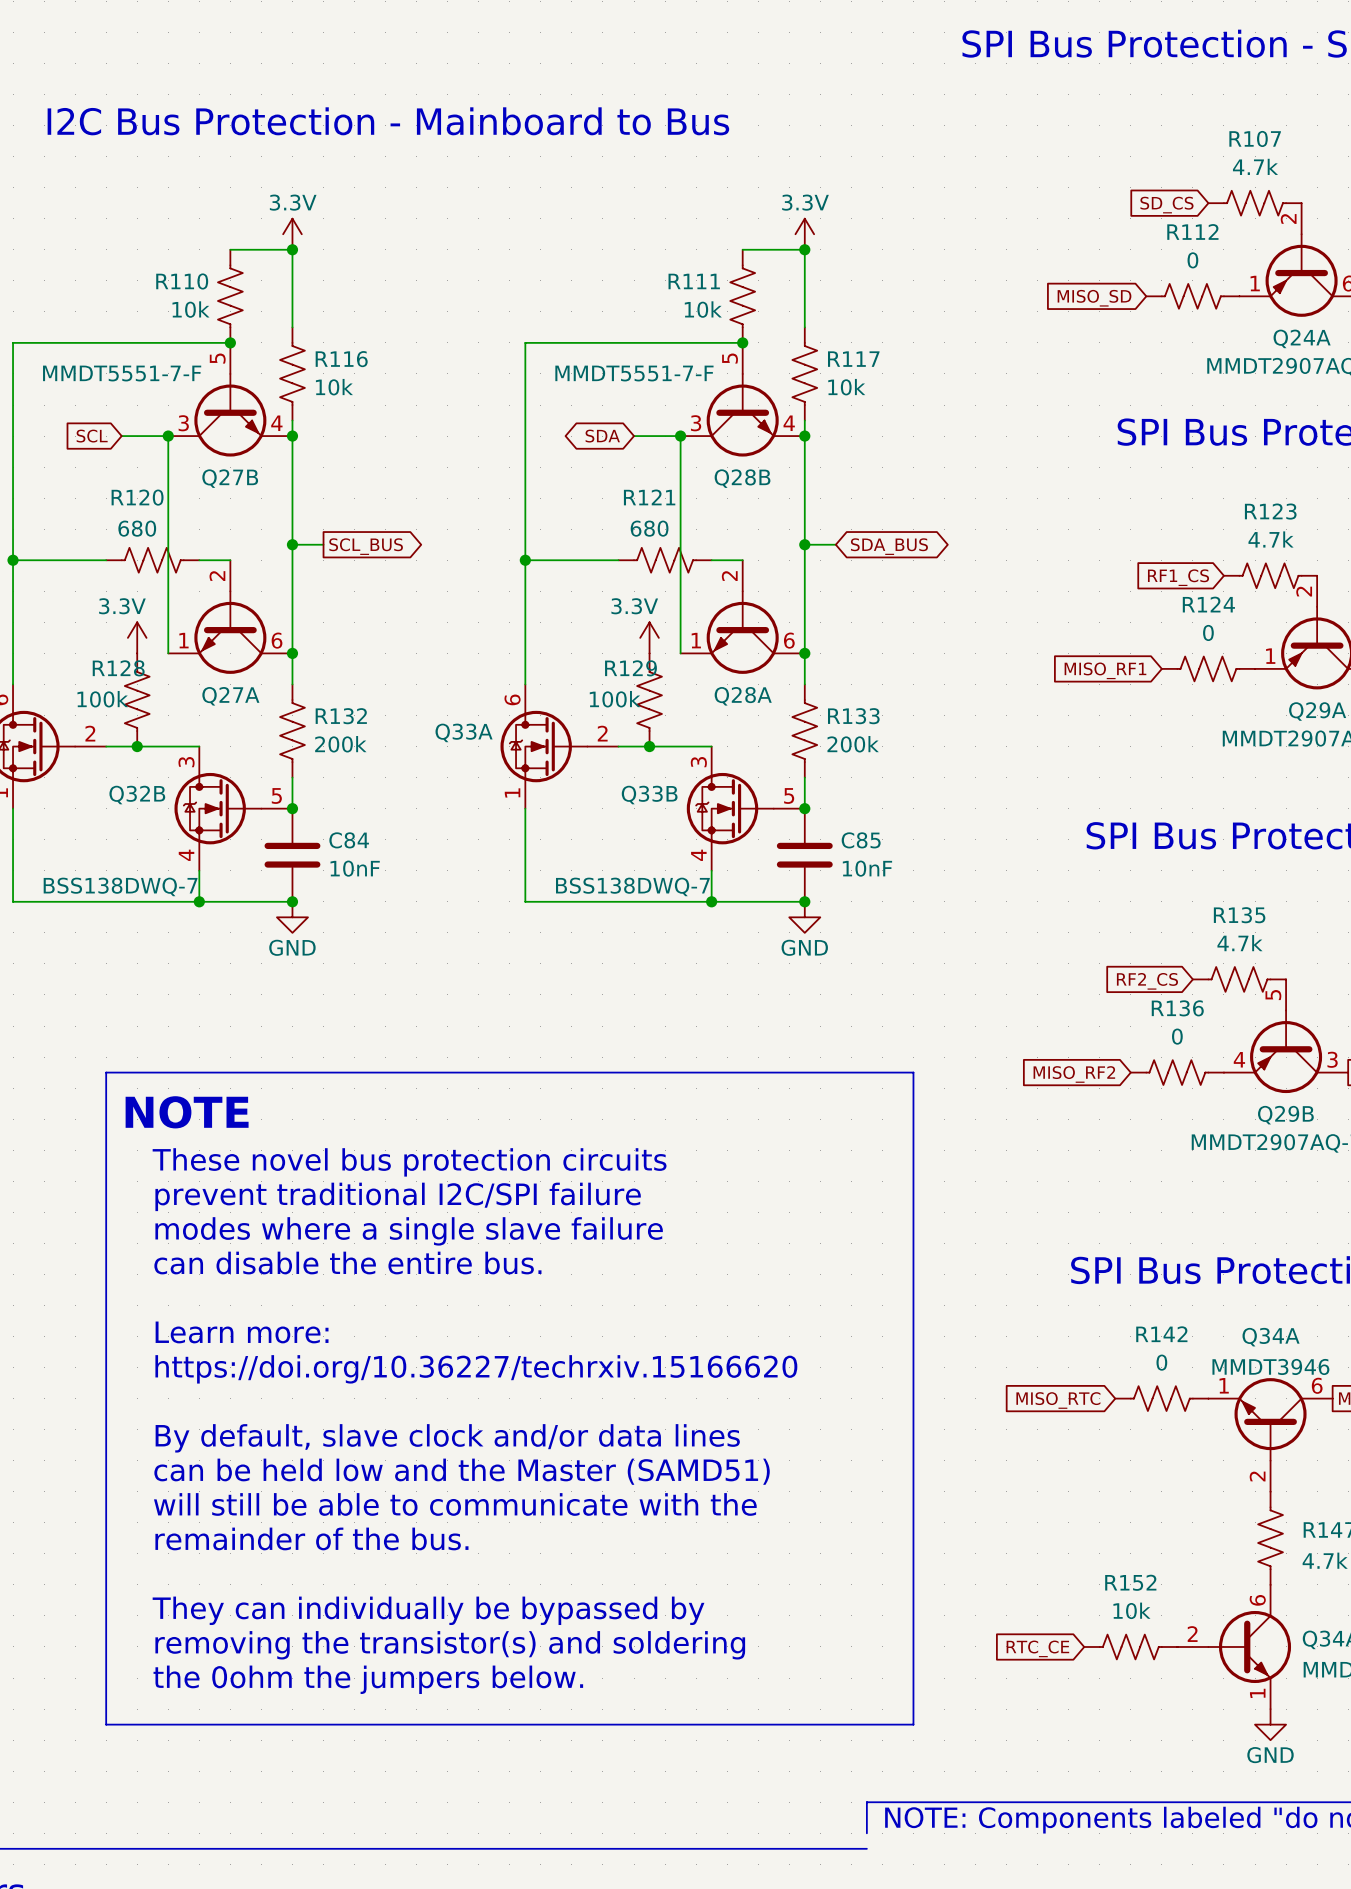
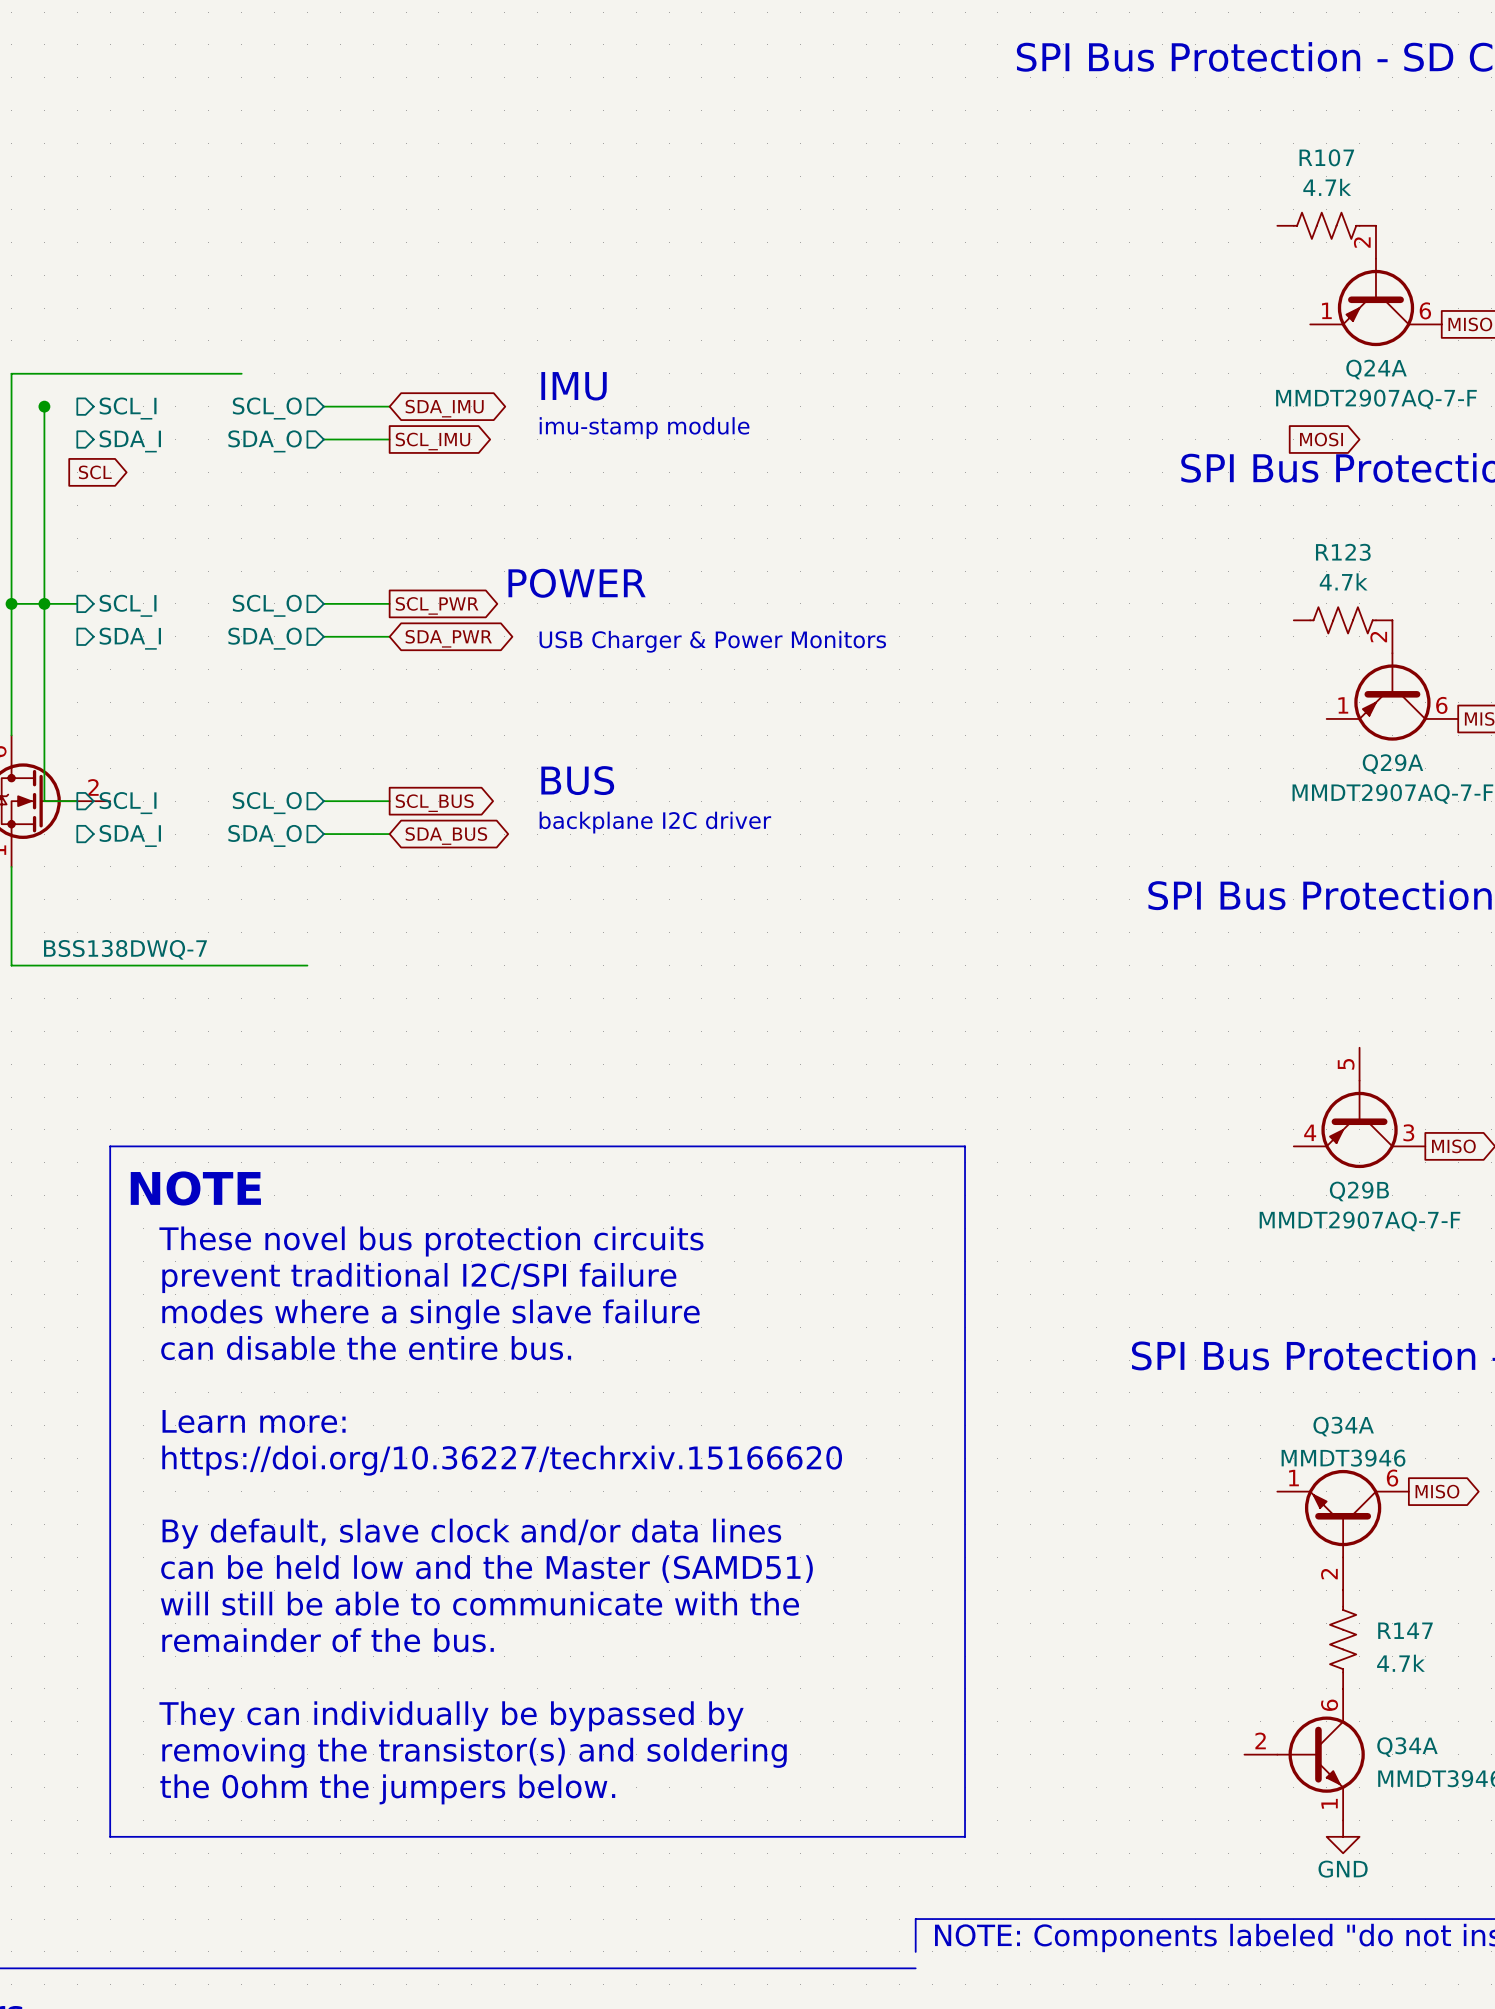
text: I2C Bus Protection - Mainboard to Bus (388, 121) -> none
global label: SD_CS (1166, 205) -> none
power symbol: 3.3V (292, 234) -> none
power symbol: 3.3V (804, 234) -> none
wire: (230, 249) (292, 249) (292, 327) -> none
junction: (292, 249) -> none
wire: (742, 249) (804, 249) (804, 327) -> none
junction: (804, 249) -> none
R110: 10k (230, 296) -> none
R111: 10k (742, 296) -> none
R112: 0 (1192, 296) -> none
global label: MISO_SD (1094, 298) -> none
junction: (230, 342) -> none
wire: (742, 342) (525, 342) (525, 684) -> none
junction: (742, 342) -> none
text: none -> IMU (574, 386)
wire: none -> (44, 406) (44, 801) (77, 801)
junction: none -> (44, 406)
R116: 10k (292, 373) -> none
wire: none -> (323, 406) (389, 406)
R117: 10k (804, 373) -> none
sheet pin: none -> SCL_I (128, 408)
sheet pin: none -> SCL_O (267, 408)
global label: none -> SDA_IMU (444, 408)
text: none -> imu-stamp module (644, 428)
Q27B: MMDT5551-7-F (230, 399) -> none
Q28B: MMDT5551-7-F (742, 399) -> none
wire: none -> (323, 439) (389, 439)
global label: none -> MOSI (1321, 439)
sheet pin: none -> SDA_I (130, 441)
sheet pin: none -> SDA_O (265, 441)
global label: none -> SCL_IMU (432, 441)
wire: (292, 420) (292, 684) -> none
wire: (804, 420) (804, 684) -> none
wire: (121, 436) (168, 436) (168, 653) -> none
junction: (168, 436) -> none
junction: (292, 436) -> none
global label: SDA (602, 436) -> none
wire: (634, 436) (680, 436) (680, 653) -> none
junction: (680, 436) -> none
junction: (804, 436) -> none
text: none -> POWER (577, 583)
wire: (292, 544) (323, 544) -> none
junction: (292, 544) -> none
wire: (804, 544) (835, 544) -> none
junction: (804, 544) -> none
global label position: SCL_BUS (366, 546) -> SCL_BUS (434, 803)
global label: SDA_BUS (889, 546) -> none
junction: none -> (44, 603)
wire: (75, 560) (106, 560) -> none
R120: 680 (152, 560) -> none
wire: (199, 560) (230, 560) -> none
wire: none -> (323, 603) (389, 603)
wire: (525, 560) (618, 560) -> none
junction: (525, 560) -> none
R121: 680 (665, 560) -> none
wire: (711, 560) (742, 560) -> none
sheet pin: none -> SCL_I (128, 605)
sheet pin: none -> SCL_O (267, 605)
global label: none -> SCL_PWR (437, 605)
global label: RF1_CS (1178, 577) -> none
wire: none -> (323, 636) (389, 636)
sheet pin: none -> SDA_I (130, 638)
sheet pin: none -> SDA_O (265, 638)
global label: none -> SDA_PWR (448, 638)
text: none -> USB Charger & Power Monitors (712, 641)
Q27A: (230, 617) -> none
Q28A: (742, 617) -> none
power symbol: 3.3V (137, 637) -> none
power symbol: 3.3V (649, 637) -> none
junction: (292, 653) -> none
junction: (804, 653) -> none
R124: 0 (1208, 668) -> none
global label: MISO_RF1 (1105, 670) -> none
R128: 100k (137, 699) -> none
R129: 100k (649, 699) -> none
text: none -> BUS (577, 780)
R132: 200k (292, 731) -> none
R133: 200k (804, 731) -> none
wire: (106, 746) (199, 746) -> none
junction: (137, 746) -> none
wire: none -> (323, 801) (389, 801)
Q33A: BSS138DWQ-7 (559, 746) -> none
wire: (618, 746) (711, 746) -> none
junction: (649, 746) -> none
sheet pin: none -> SCL_I (128, 803)
sheet pin: none -> SCL_O (267, 803)
text: none -> backplane I2C driver (655, 822)
wire: (292, 777) (292, 808) -> none
wire: none -> (323, 834) (389, 834)
wire: (804, 777) (804, 808) -> none
sheet pin: none -> SDA_I (130, 835)
sheet pin: none -> SDA_O (265, 835)
global label: none -> SDA_BUS (446, 836)
Q32B: (233, 808) -> none
junction: (292, 808) -> none
wire: (525, 808) (525, 901) (804, 901) -> none
Q33B: (745, 808) -> none
junction: (804, 808) -> none
C84: 10nF (292, 855) -> none
C85: 10nF (804, 855) -> none
wire: (199, 870) (199, 901) -> none
wire: (711, 870) (711, 901) -> none
junction: (199, 901) -> none
junction: (292, 901) -> none
junction: (711, 901) -> none
junction: (804, 901) -> none
power symbol: GND (292, 917) -> none
power symbol: GND (804, 917) -> none
R135: 4.7k (1239, 979) -> none
global label: RF2_CS (1147, 981) -> none
R136: 0 (1177, 1072) -> none
global label: MISO_RF2 (1074, 1074) -> none
R142: 0 (1161, 1398) -> none
global label: MISO_RTC (1058, 1400) -> none
R152: 10k (1130, 1646) -> none
global label: RTC_CE (1037, 1648) -> none

